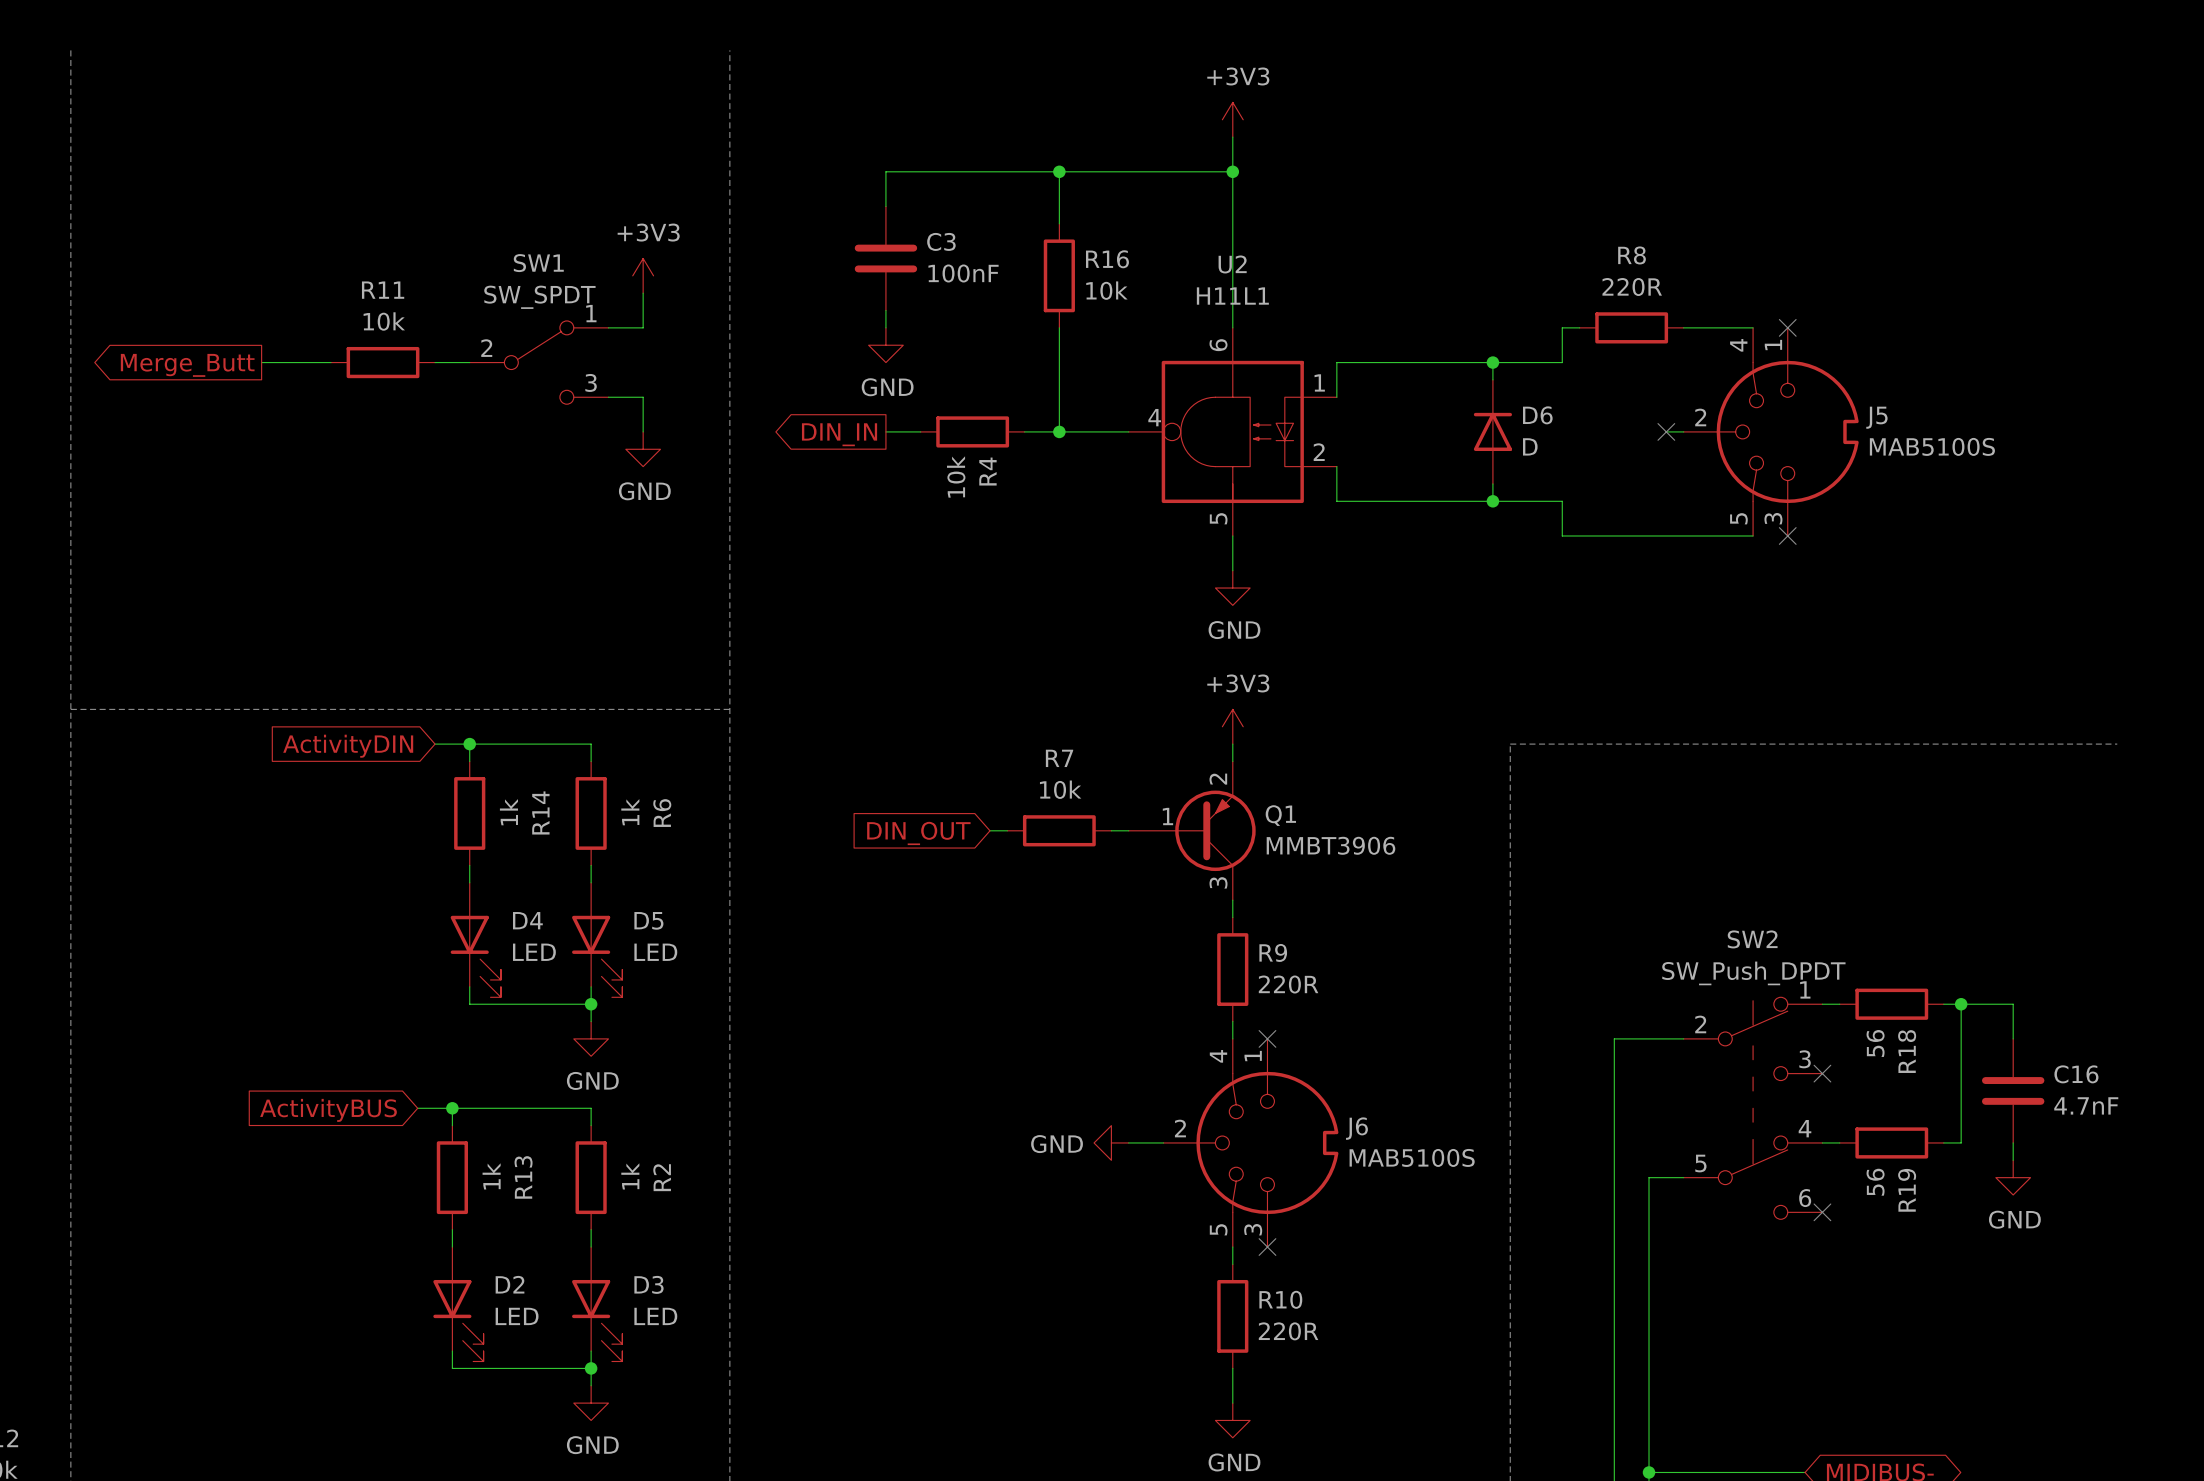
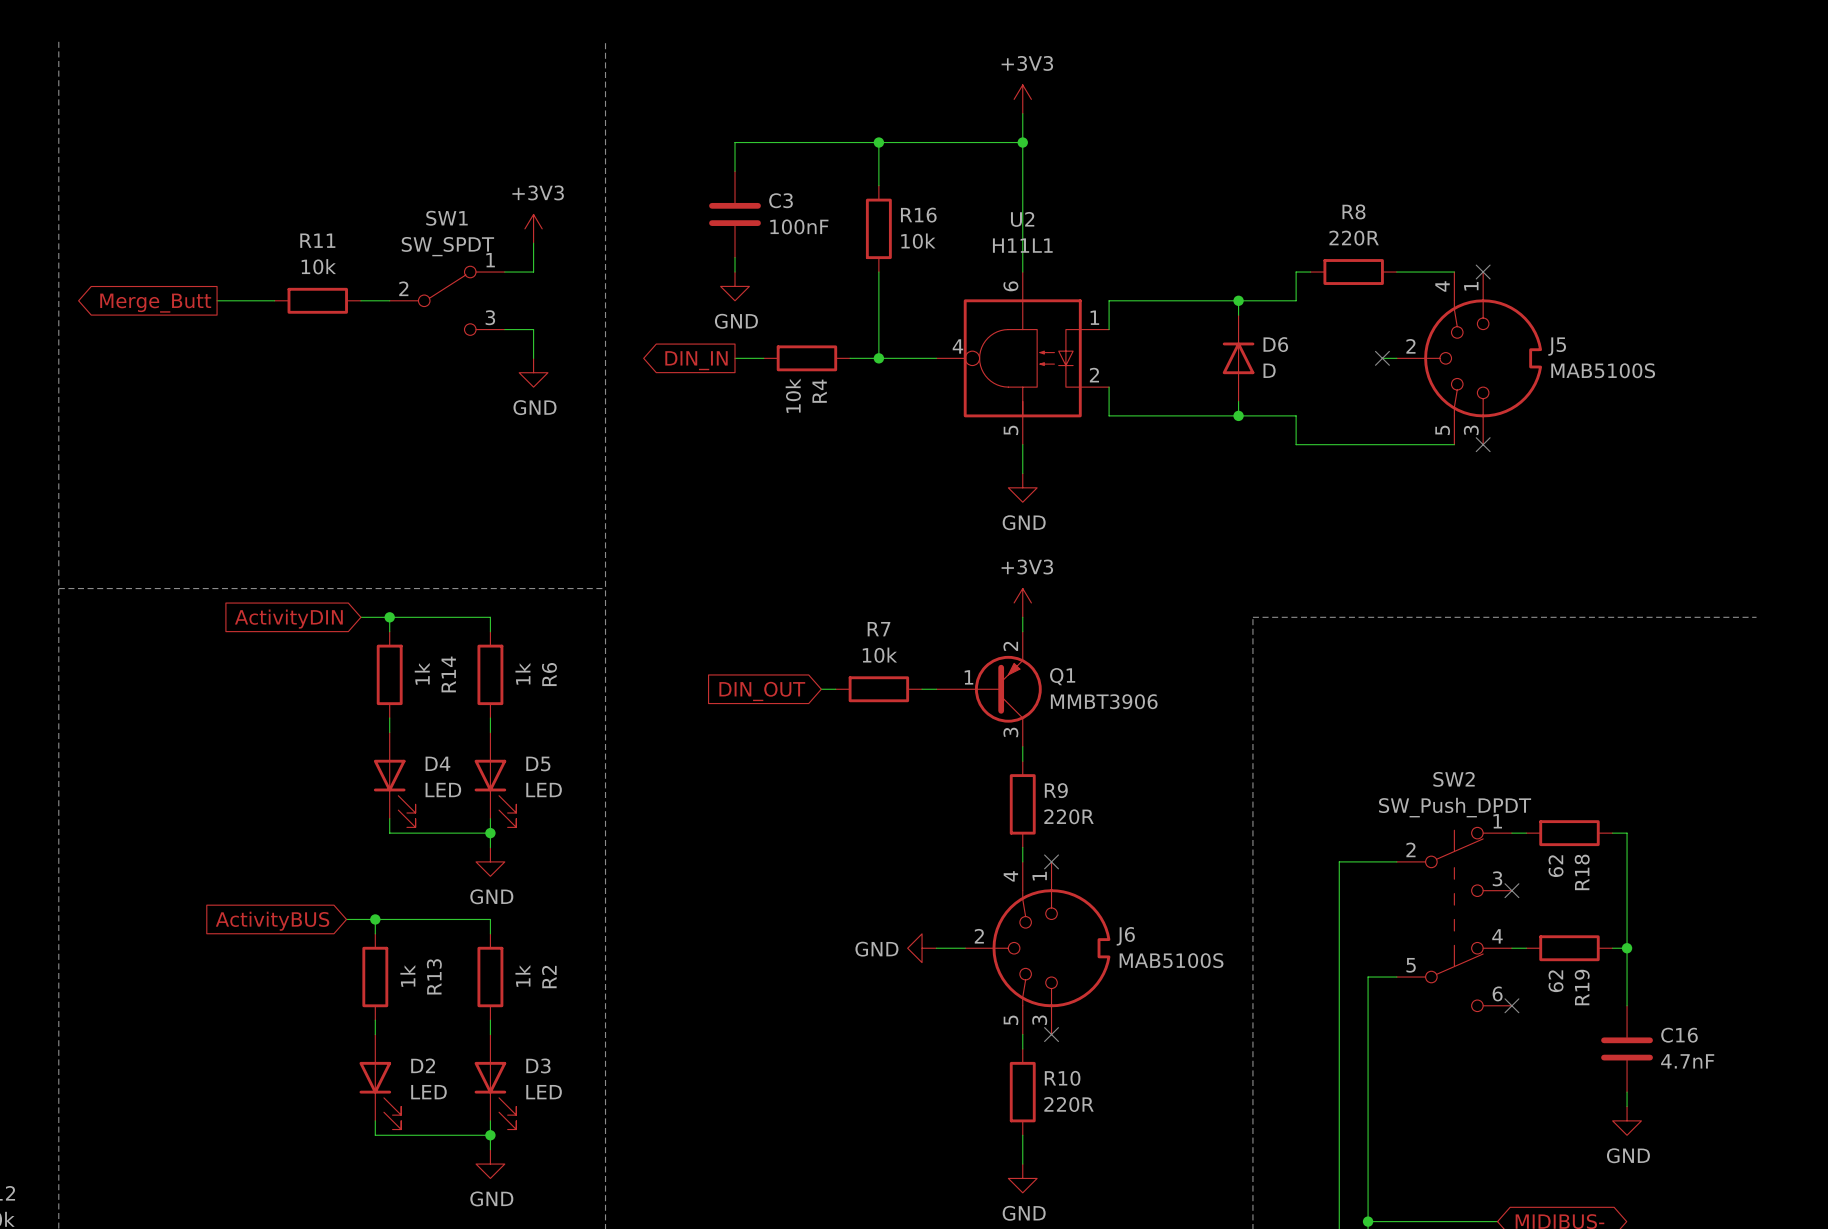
wire: (1961, 1004) (2013, 1004) (2013, 1038) -> none
junction: (1961, 1004) -> none
R18 value: 56 (1875, 1043) -> 62 (1556, 866)
C16 position: (2013, 1090) -> (1627, 1048)
wire: none -> (1627, 948) (1627, 1005)
junction: none -> (1627, 948)
wire: (2013, 1142) (2013, 1160) -> (1627, 1092) (1627, 1106)
power symbol position: GND (2013, 1177) -> GND (1627, 1120)
R19 value: 56 (1875, 1182) -> 62 (1556, 981)

